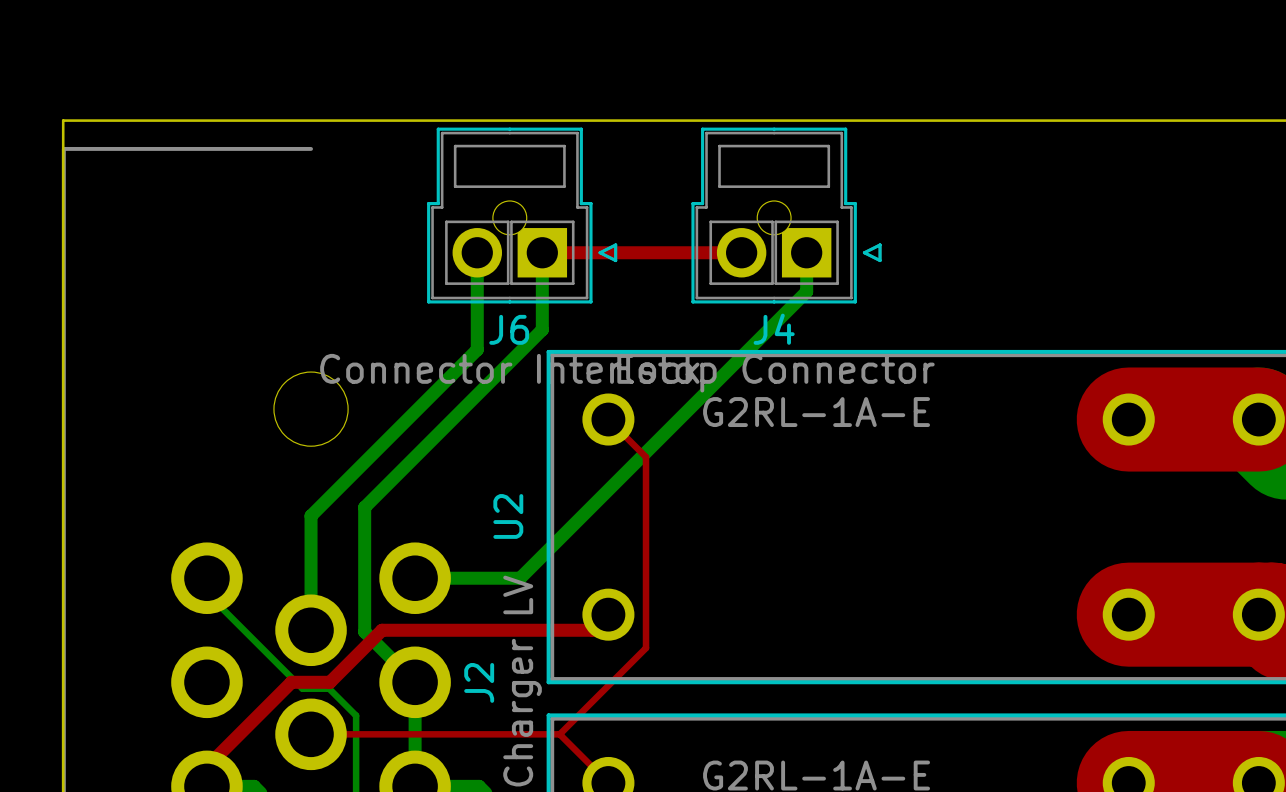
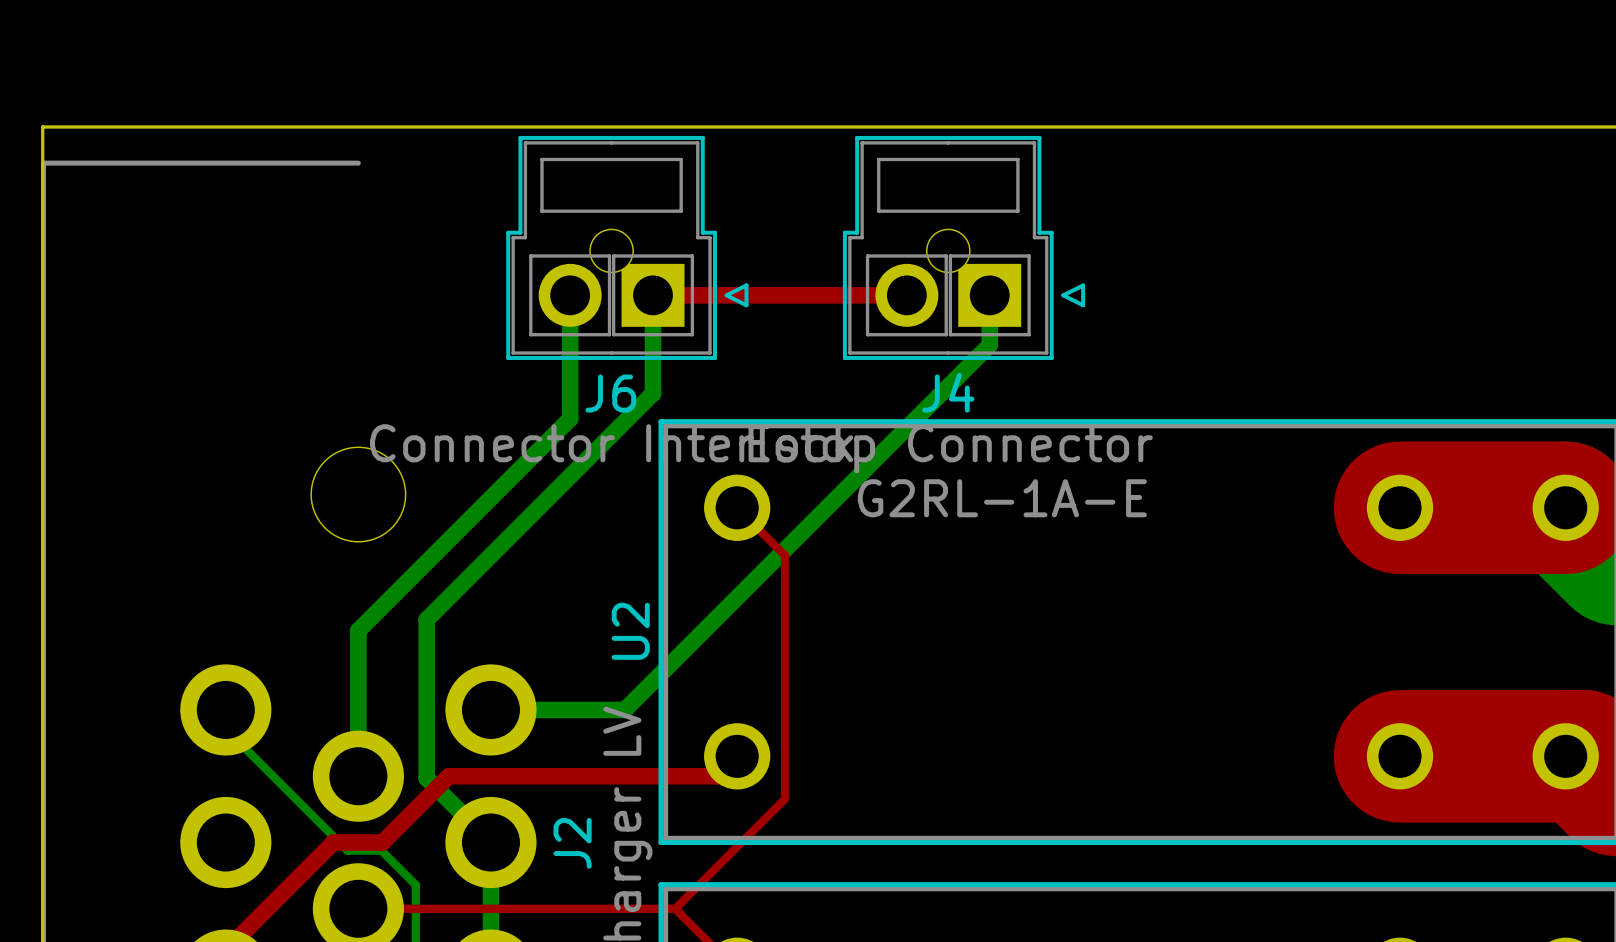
U2 name position: U2 (508, 516) -> U2 (630, 631)

